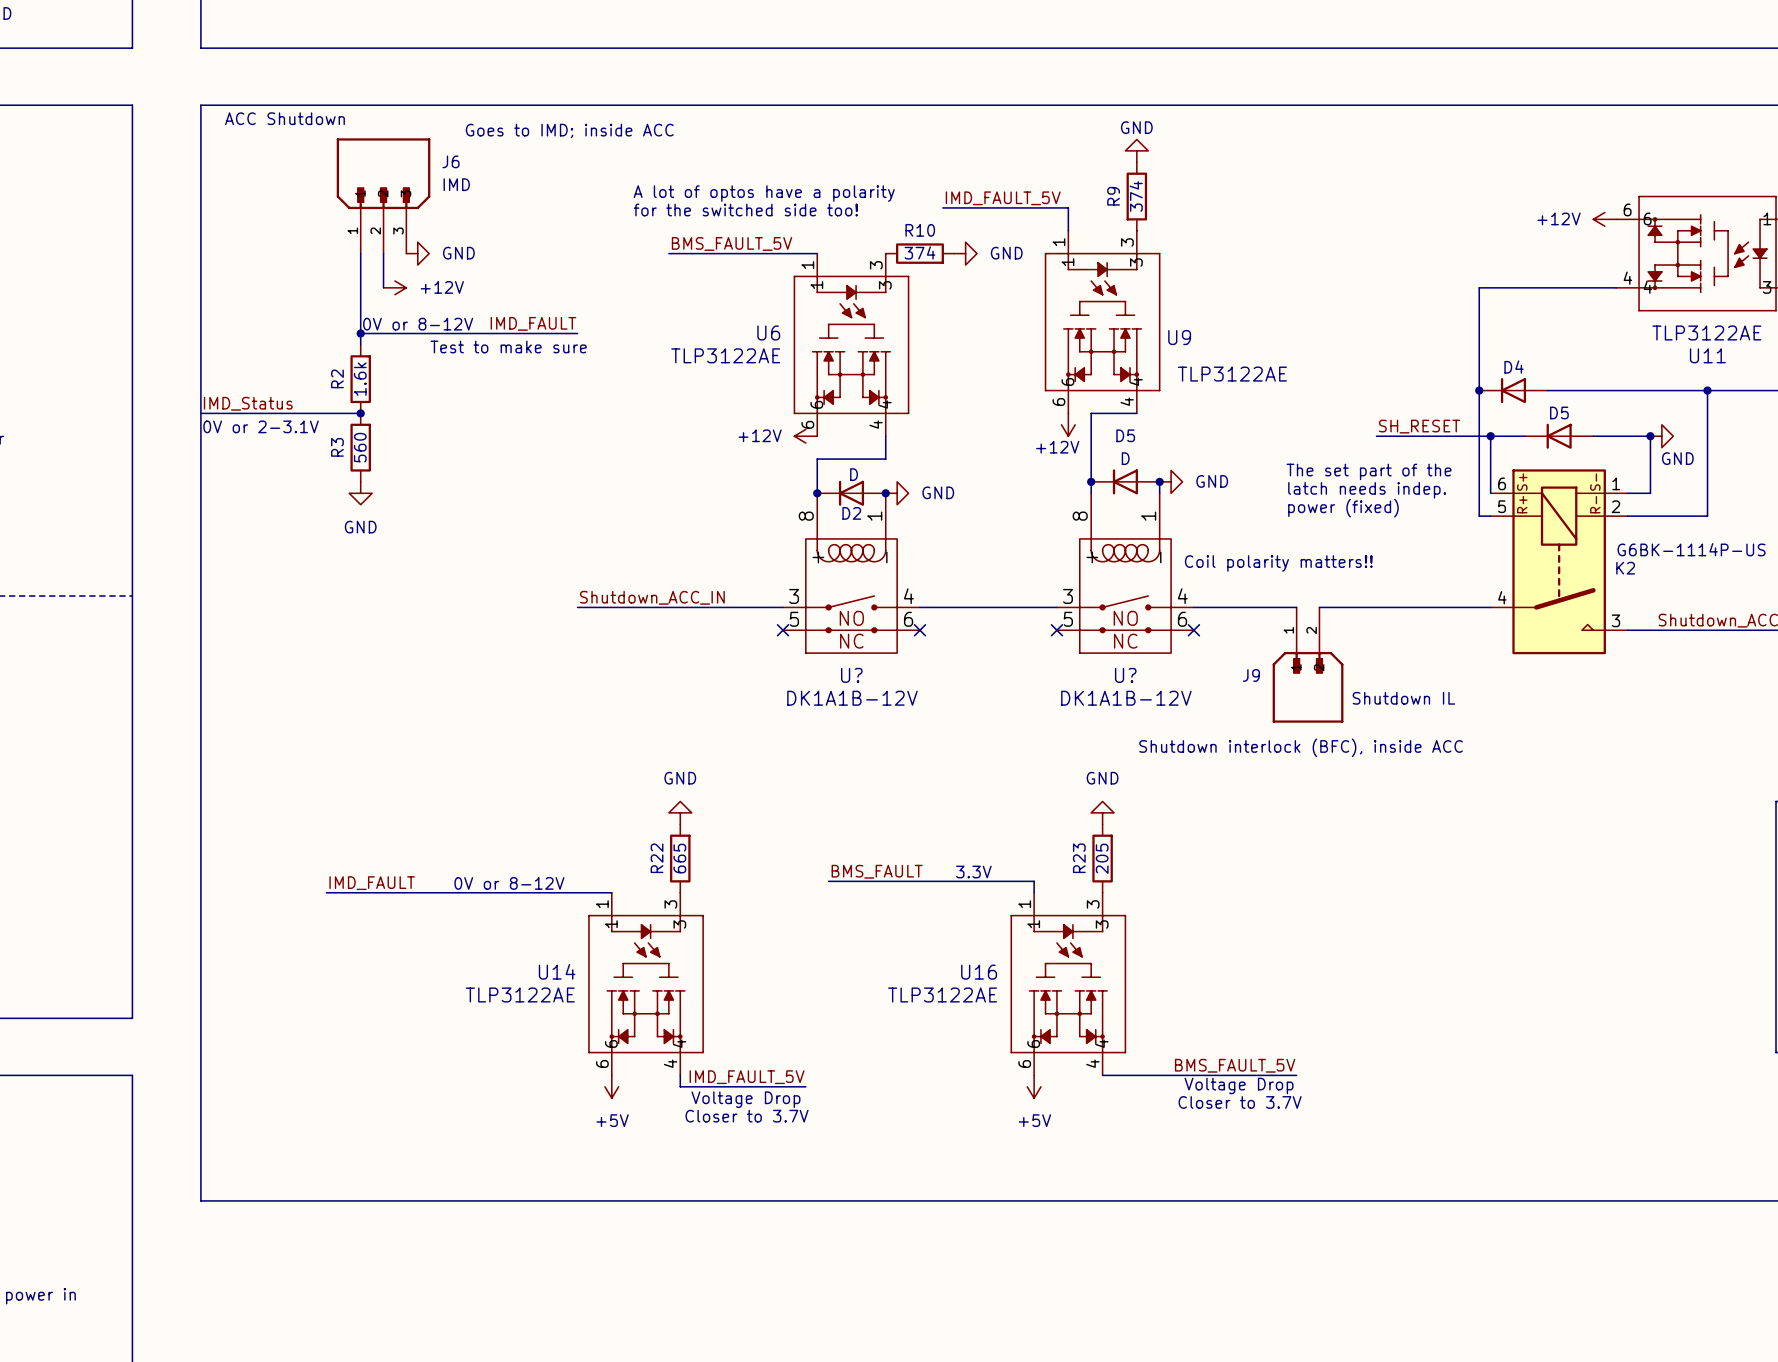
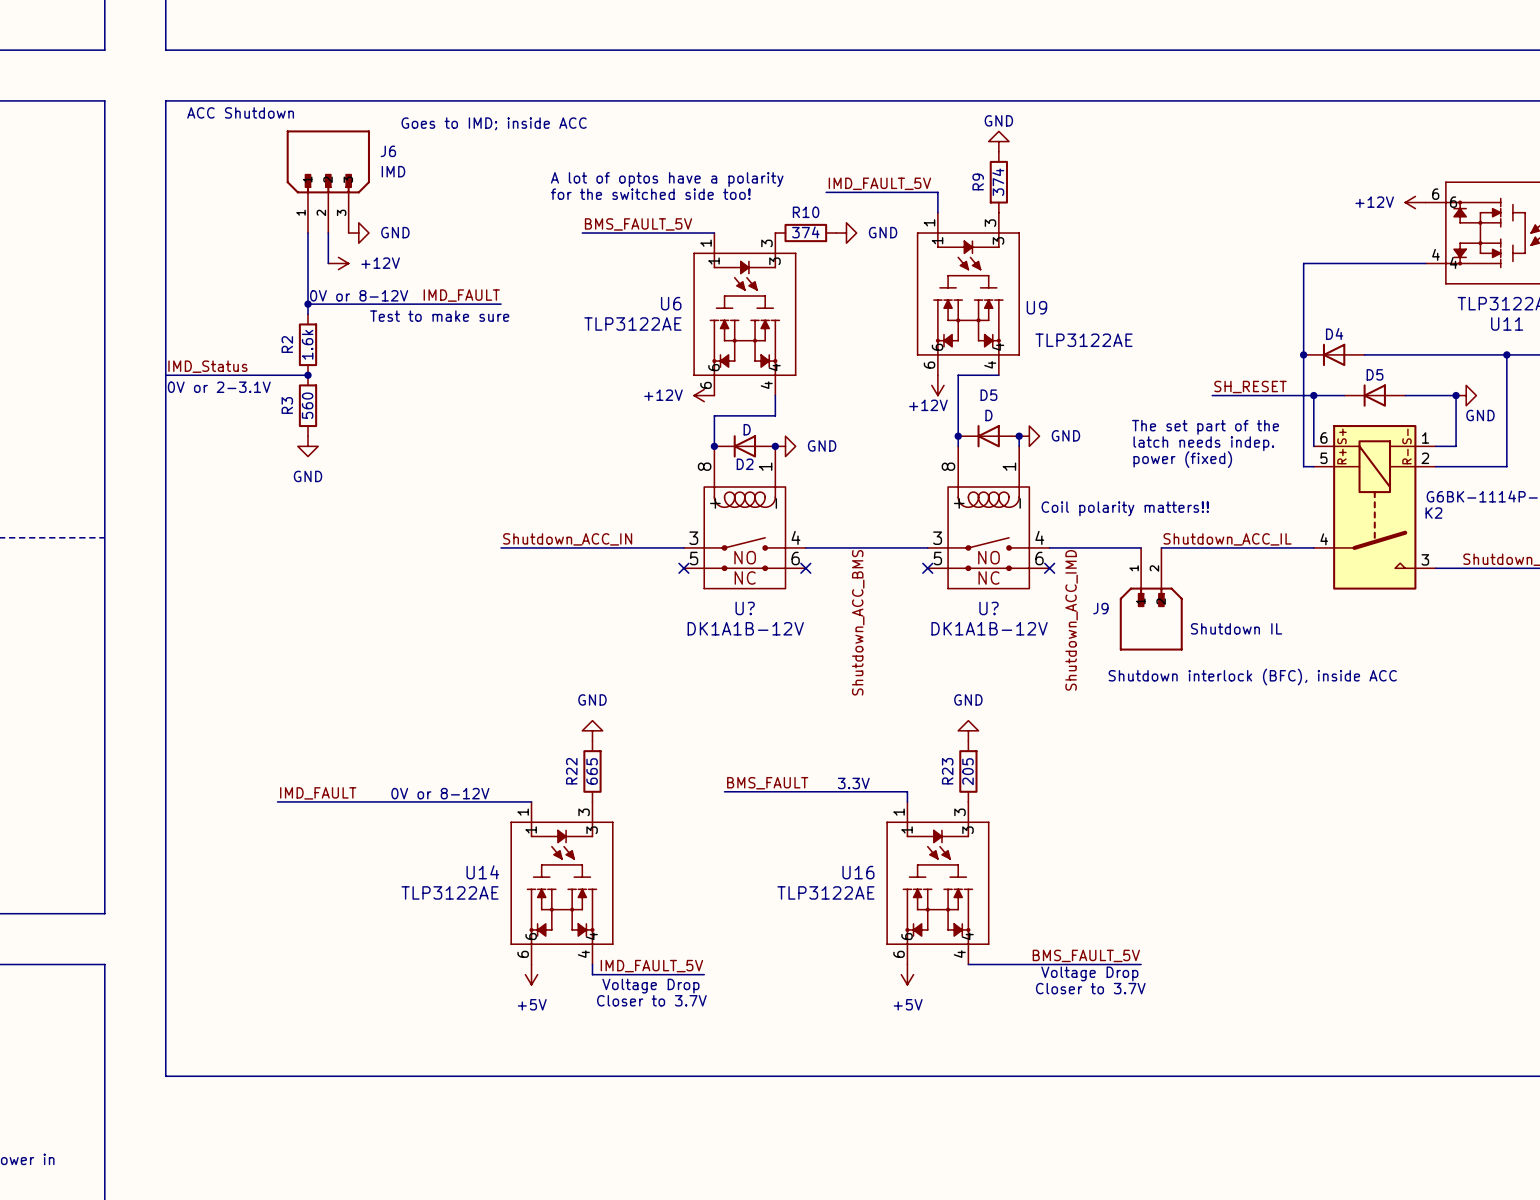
label: none -> Shutdown_ACC_IL (1227, 539)
label: none -> Shutdown_ACC_IMD (1071, 620)
label: none -> Shutdown_ACC_BMS (858, 622)
text position: Shutdown interlock (BFC), inside ACC (1301, 747) -> Shutdown interlock (BFC), inside ACC (1252, 676)

